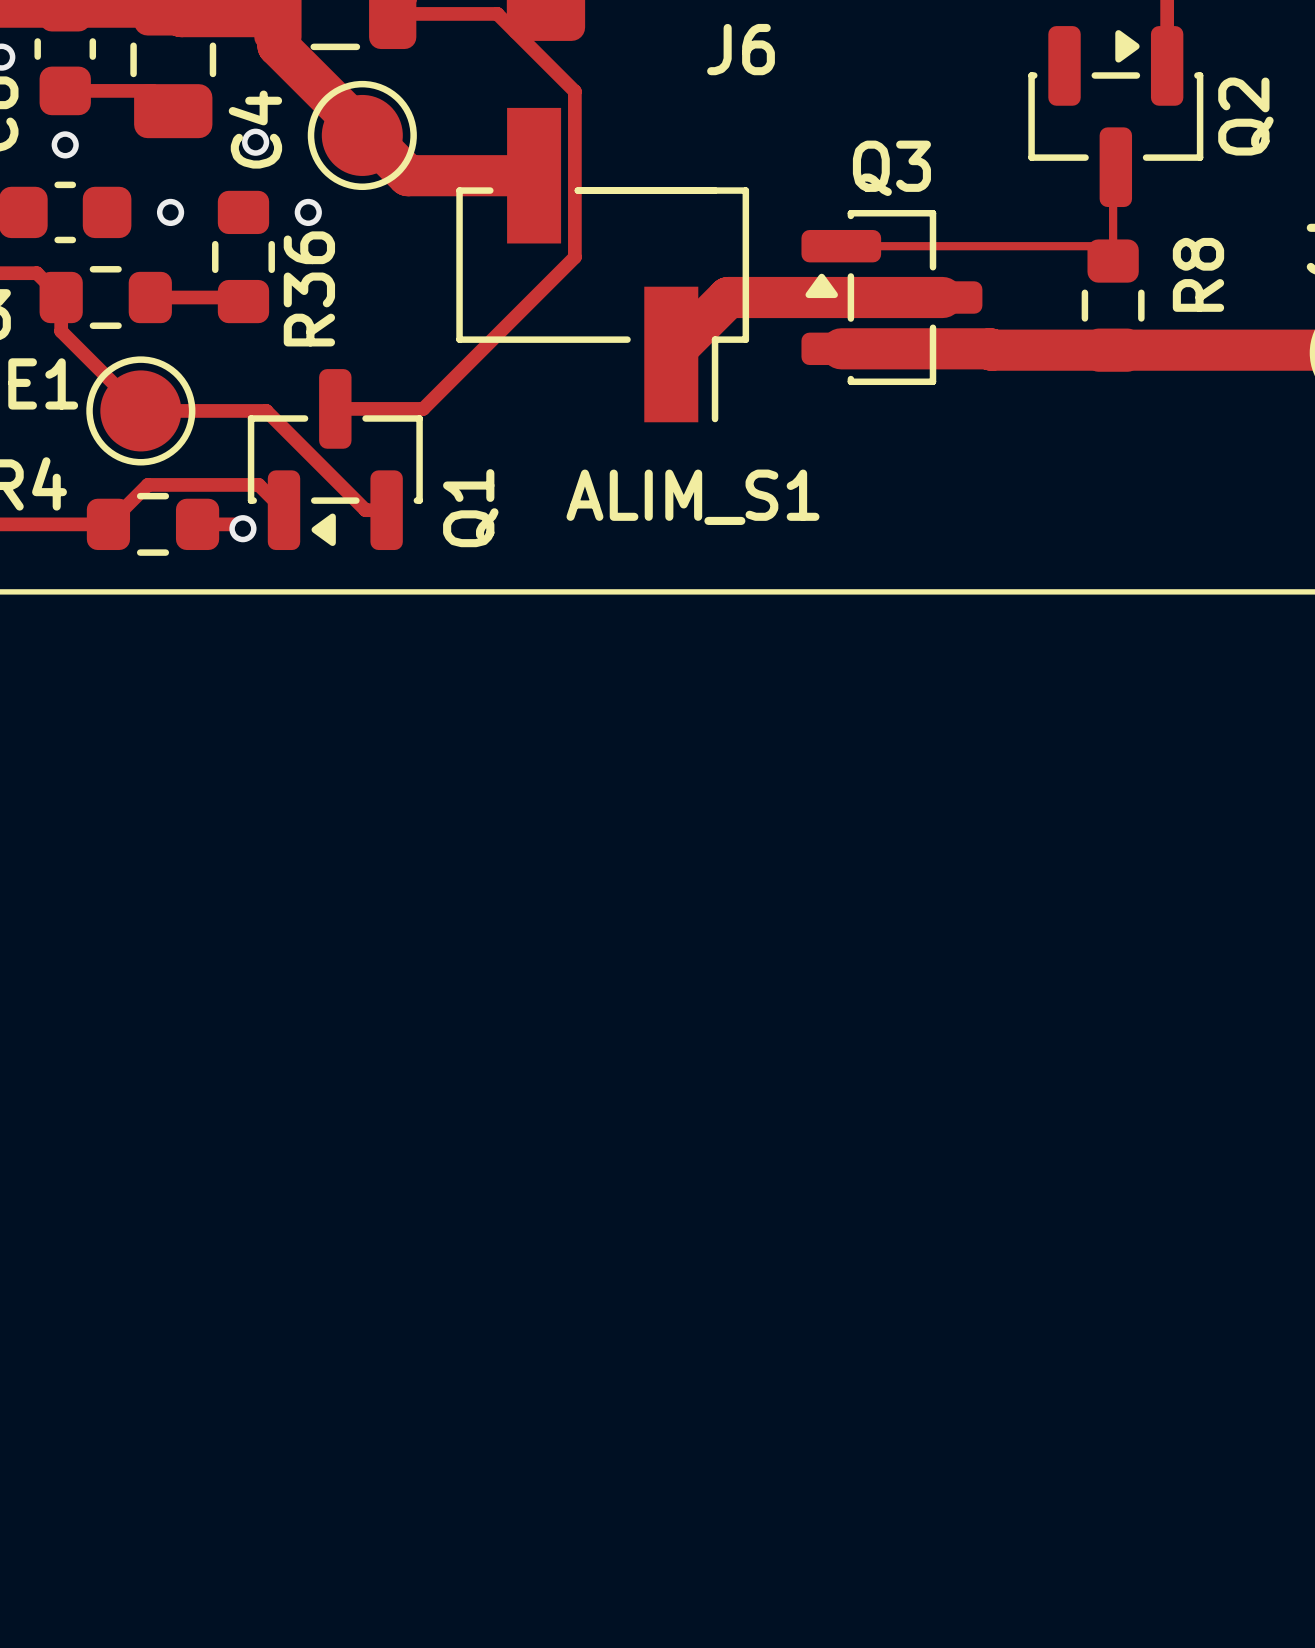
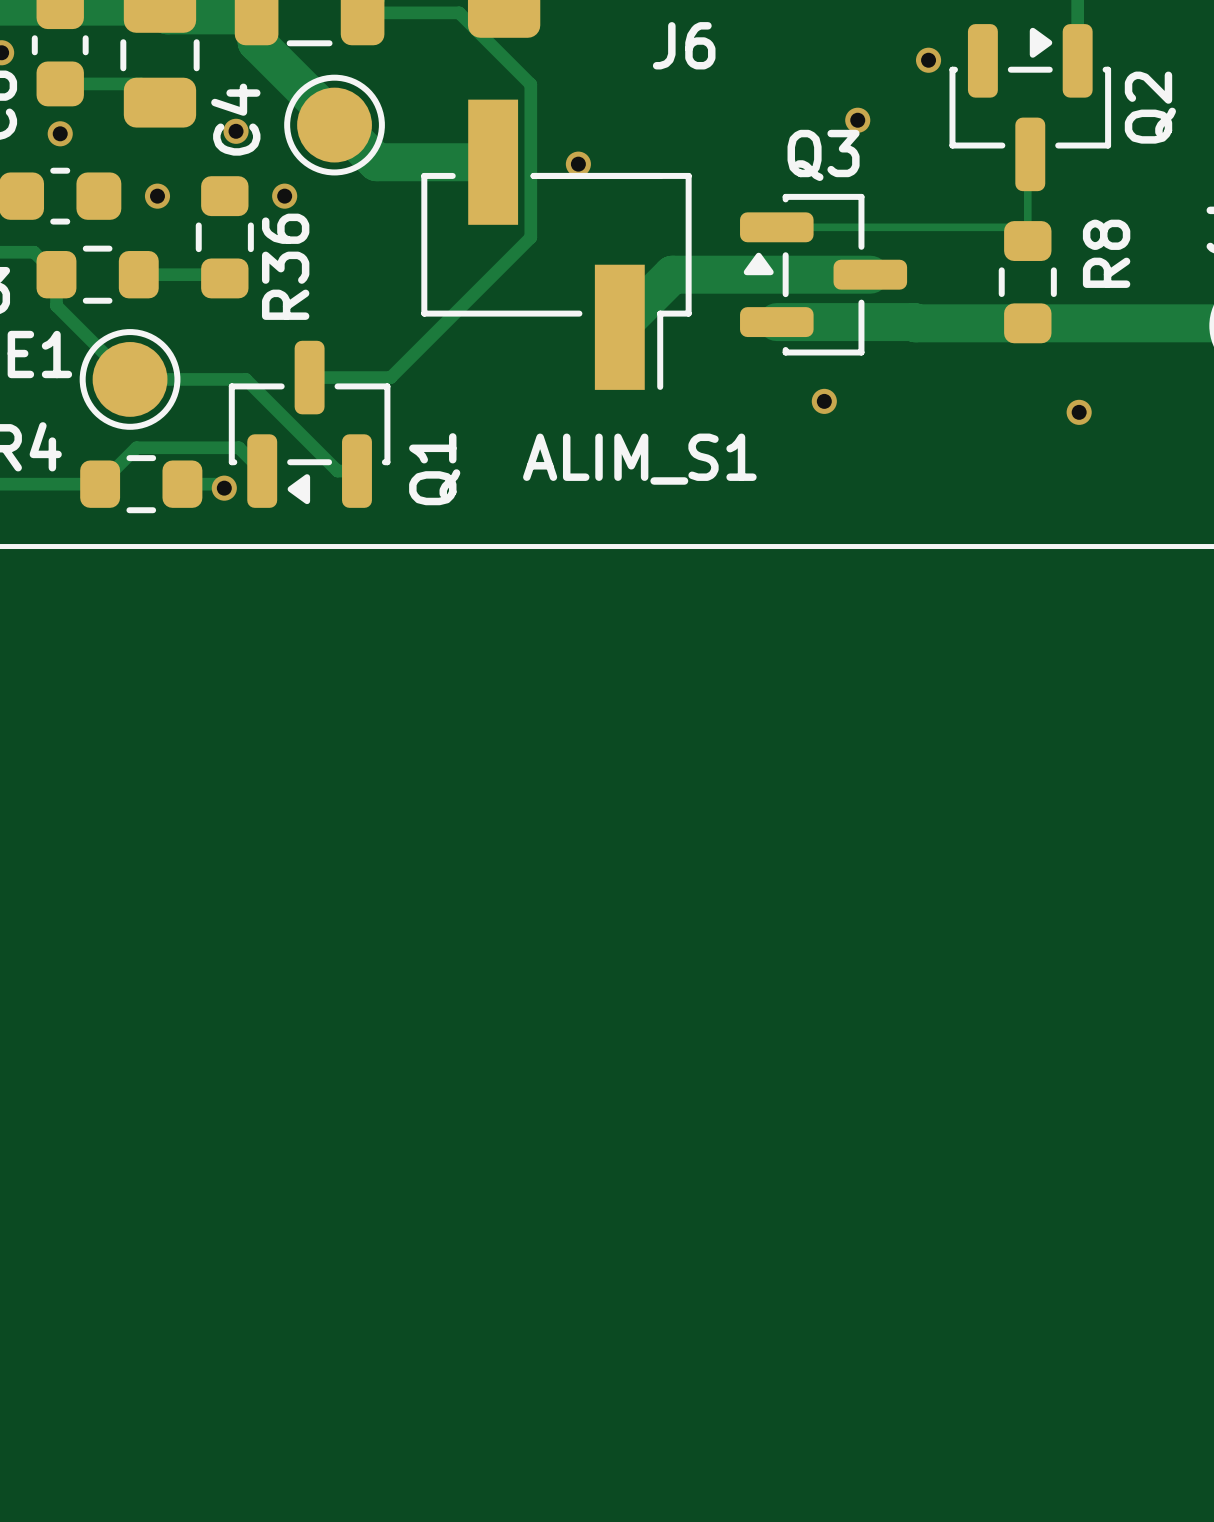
via: none -> (928, 60)
via: none -> (857, 120)
via: none -> (578, 164)
via: none -> (824, 401)
via: none -> (1079, 412)

